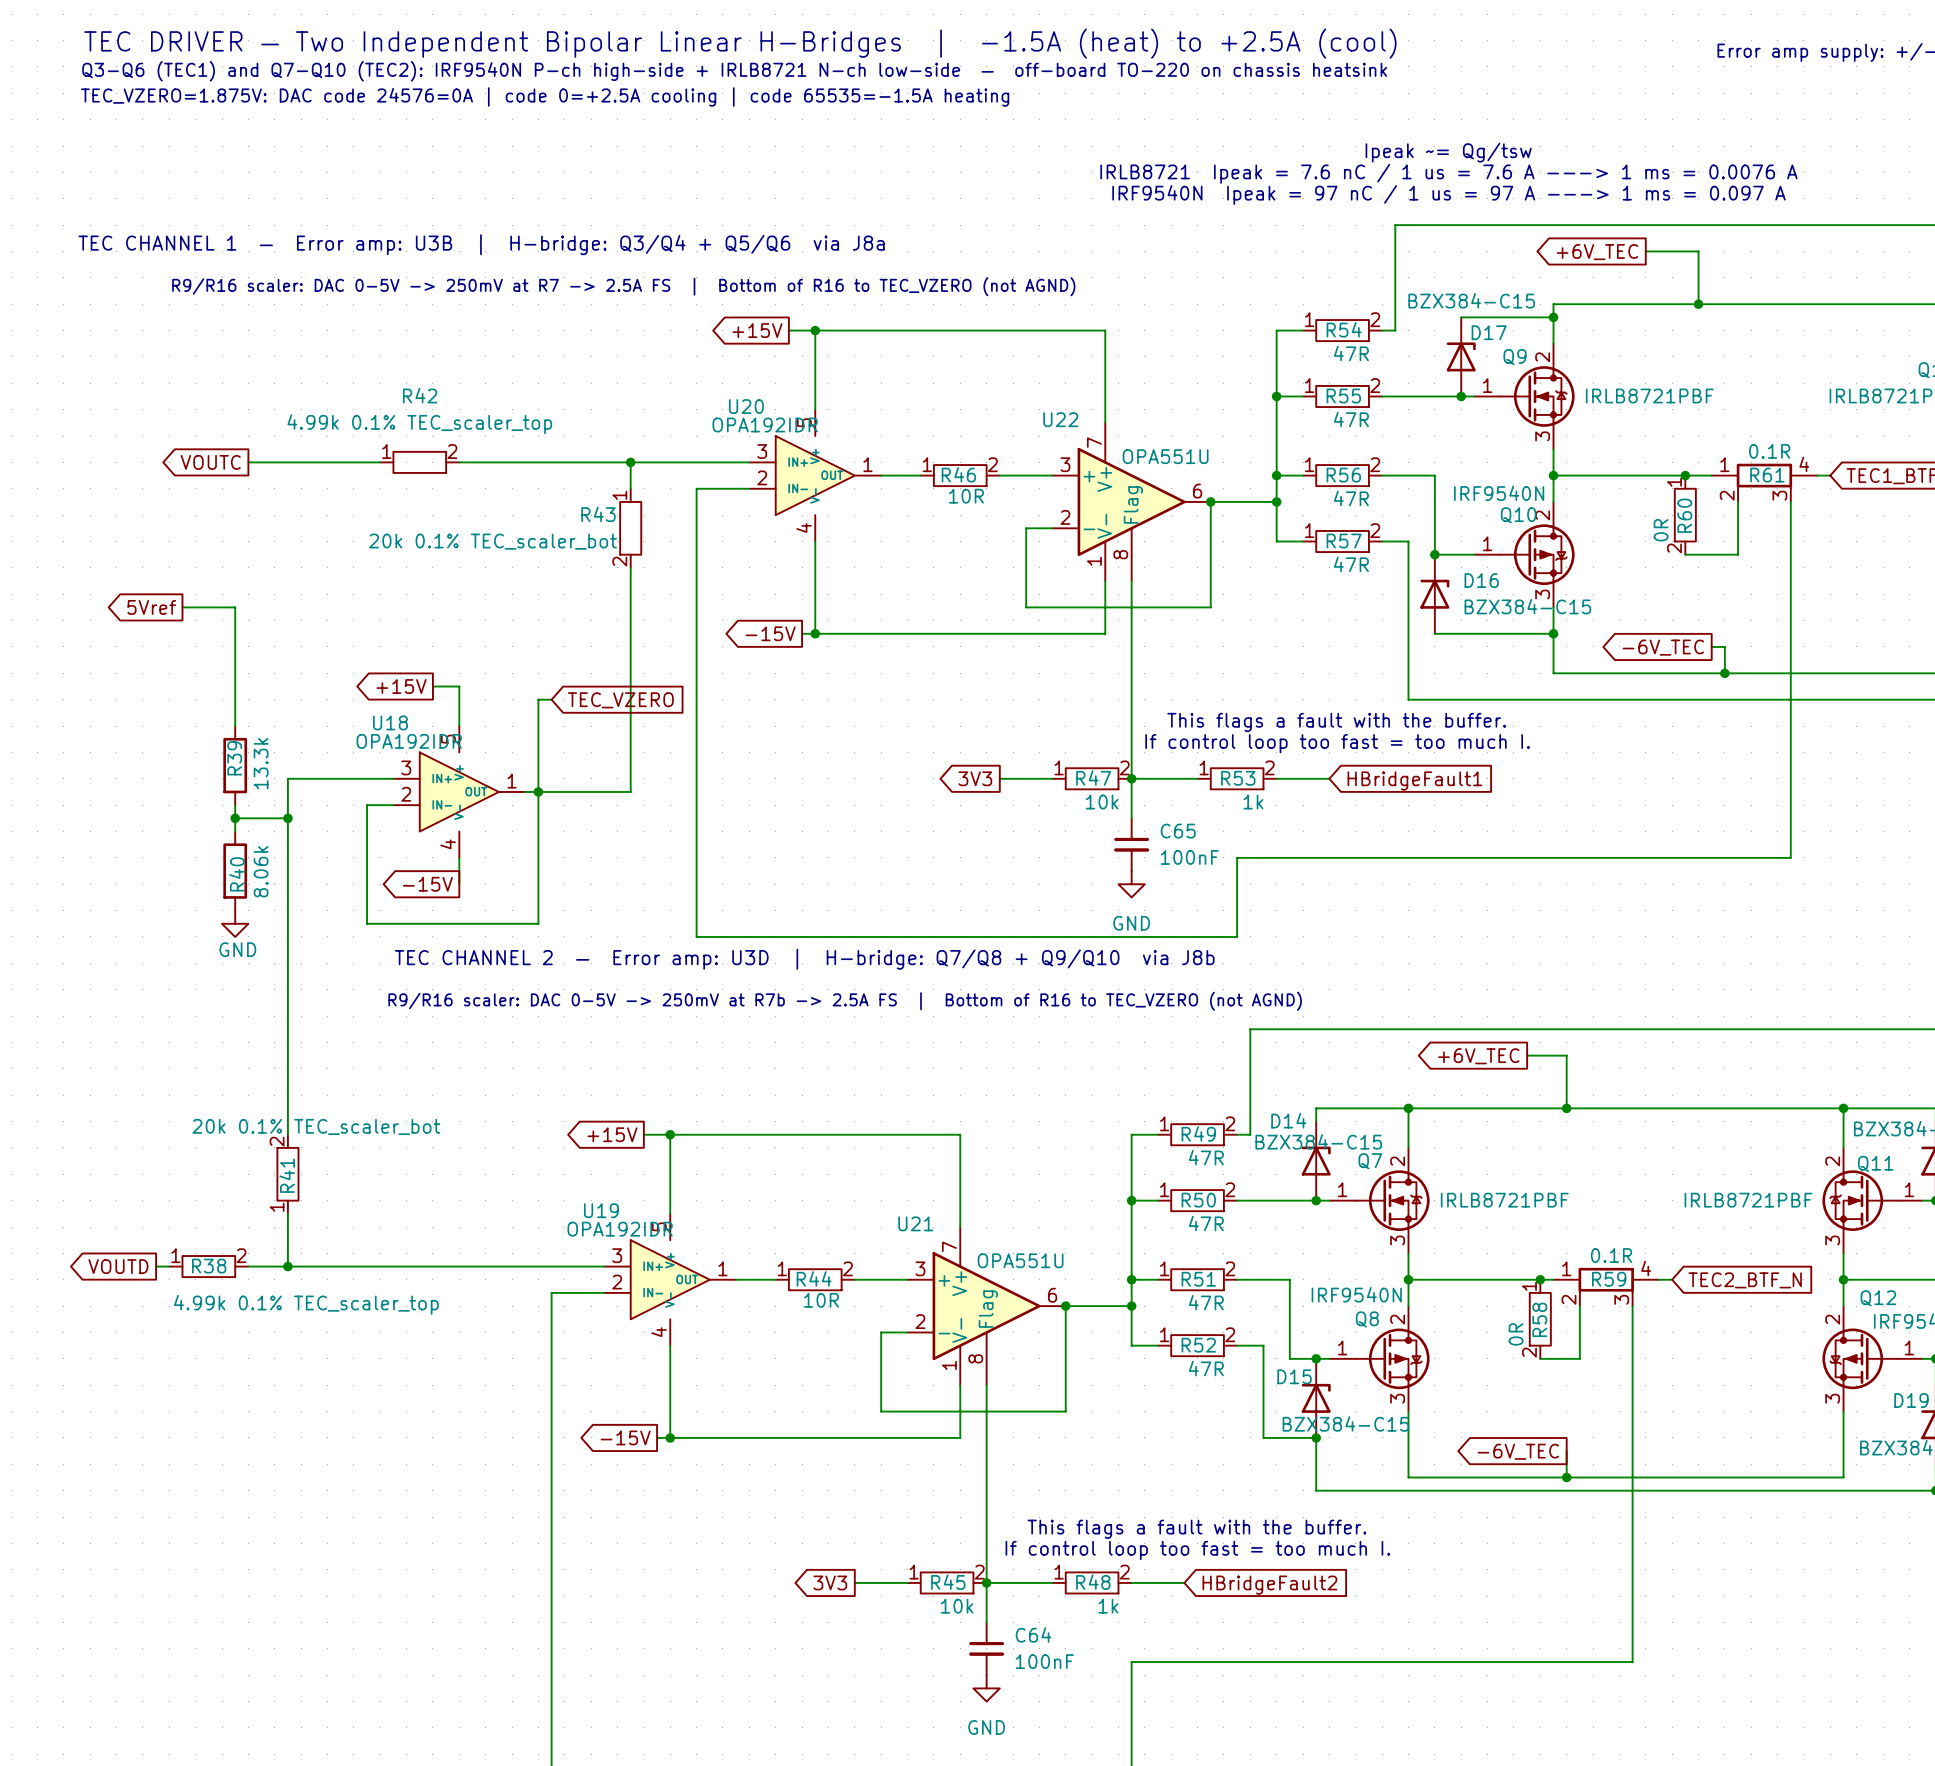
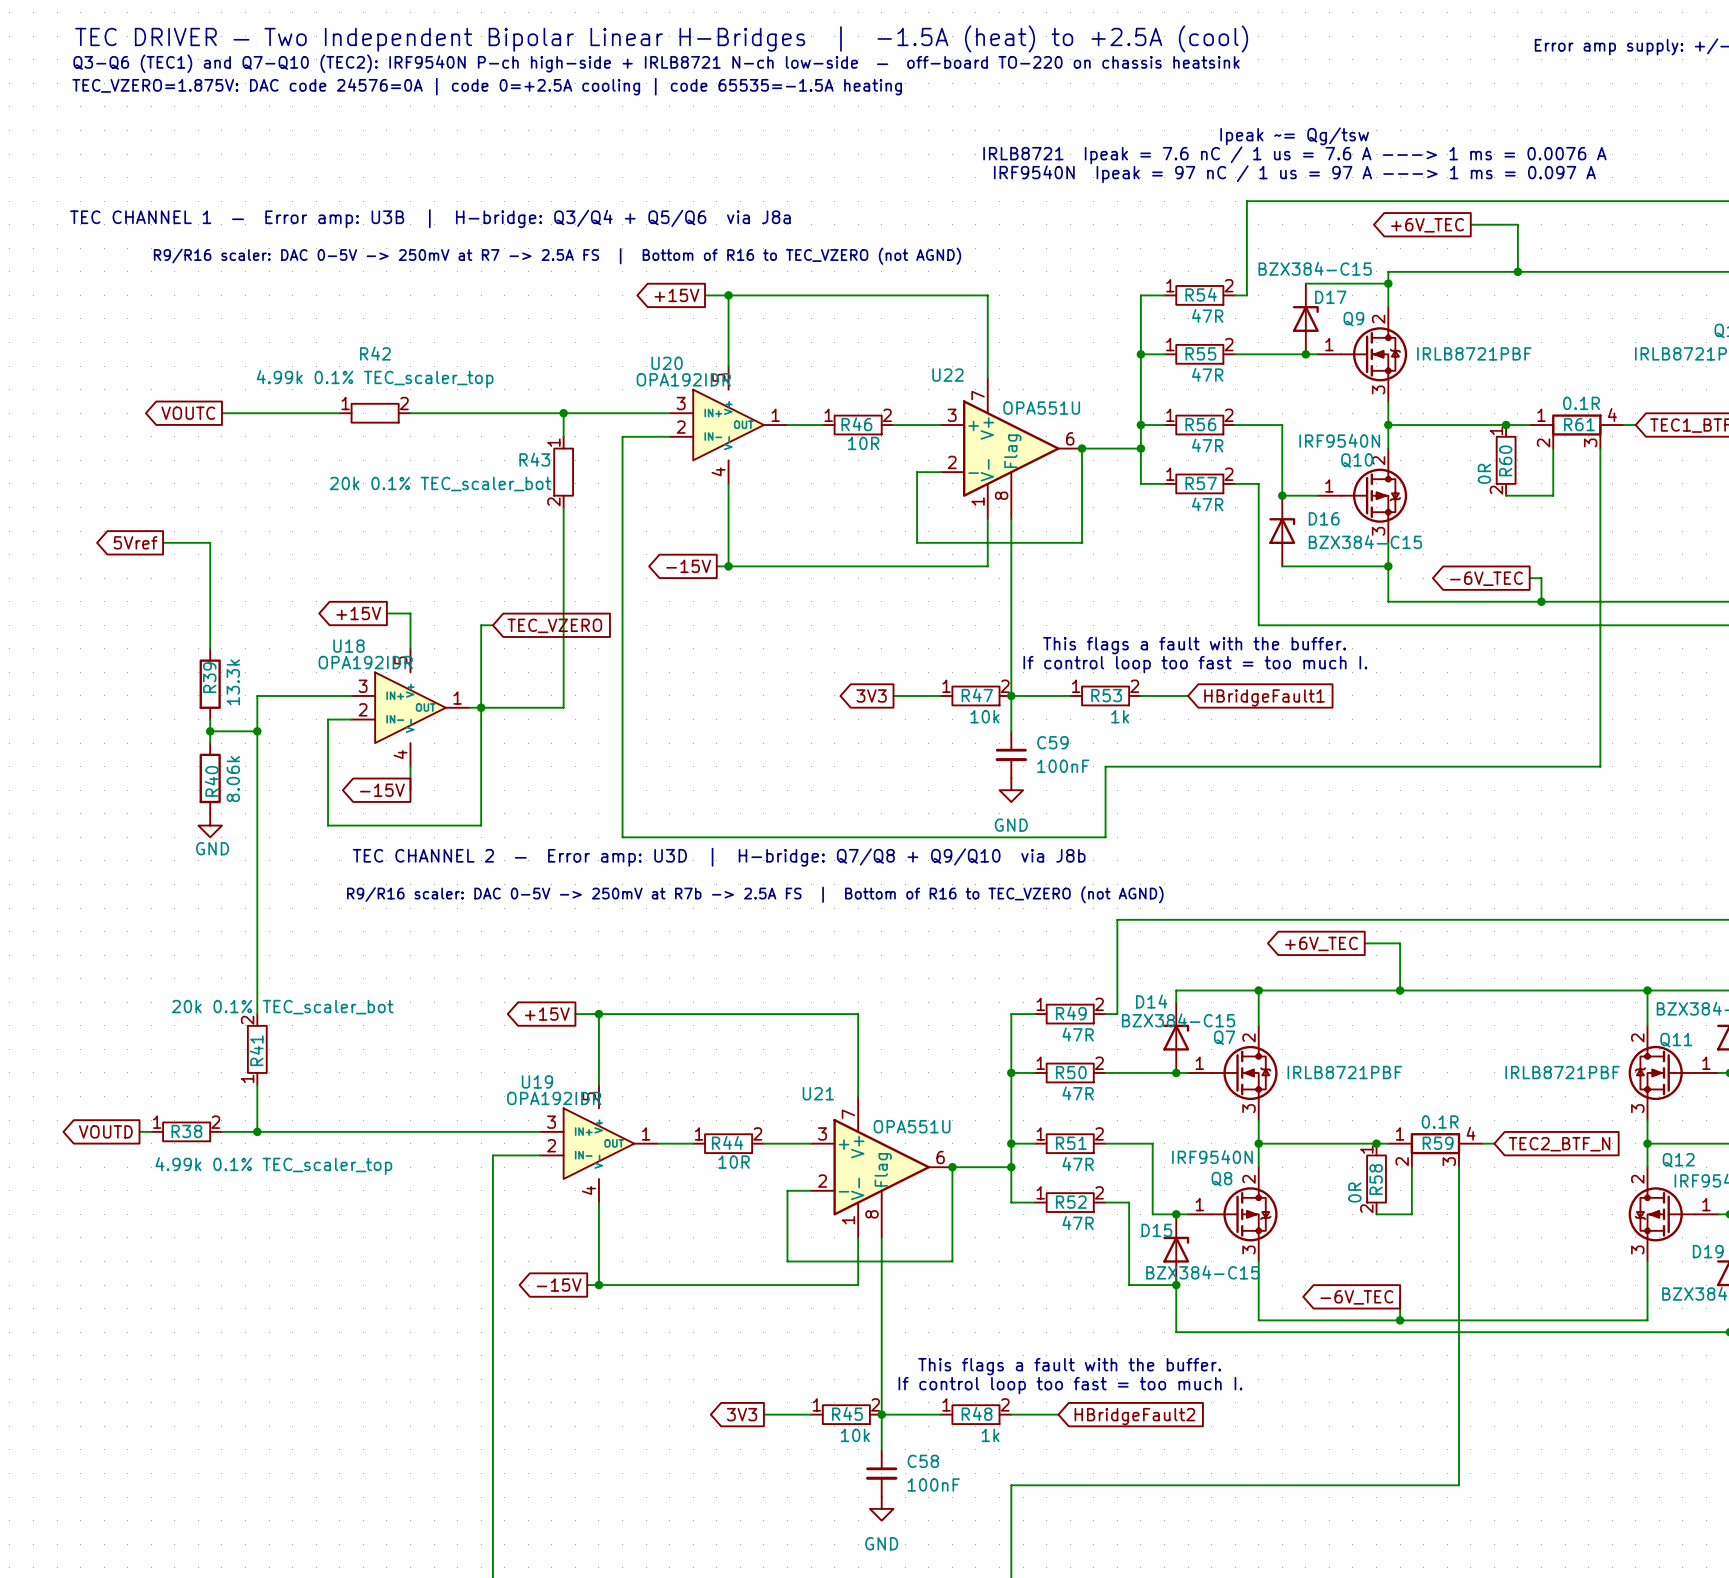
C65 name: C65 (1178, 831) -> C59 (1052, 742)
C64 name: C64 (1033, 1634) -> C58 (923, 1461)

